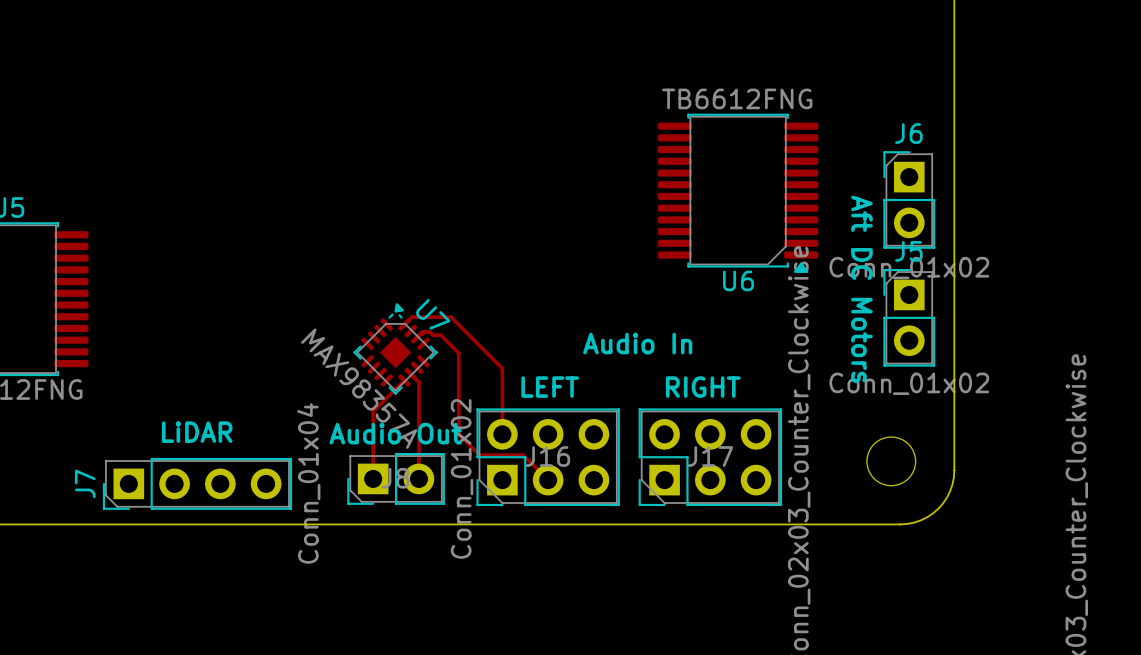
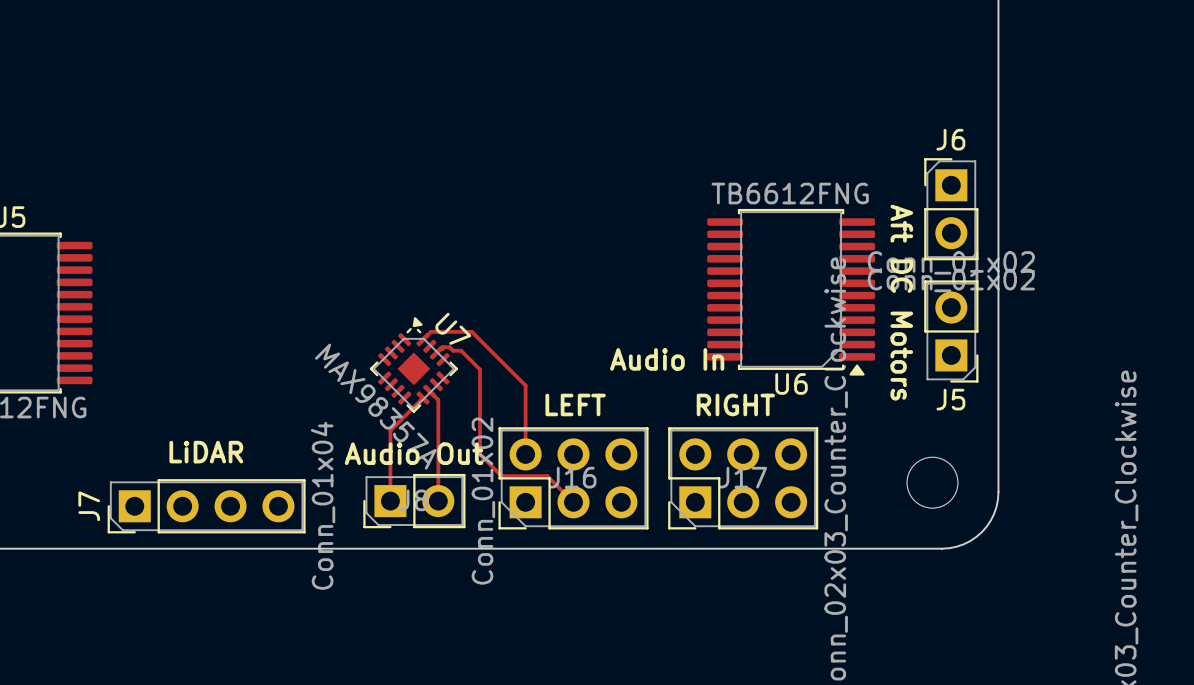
U6 position: (738, 193) -> (791, 292)
J5 rotation: 0° (909, 317) -> 180° (951, 331)

